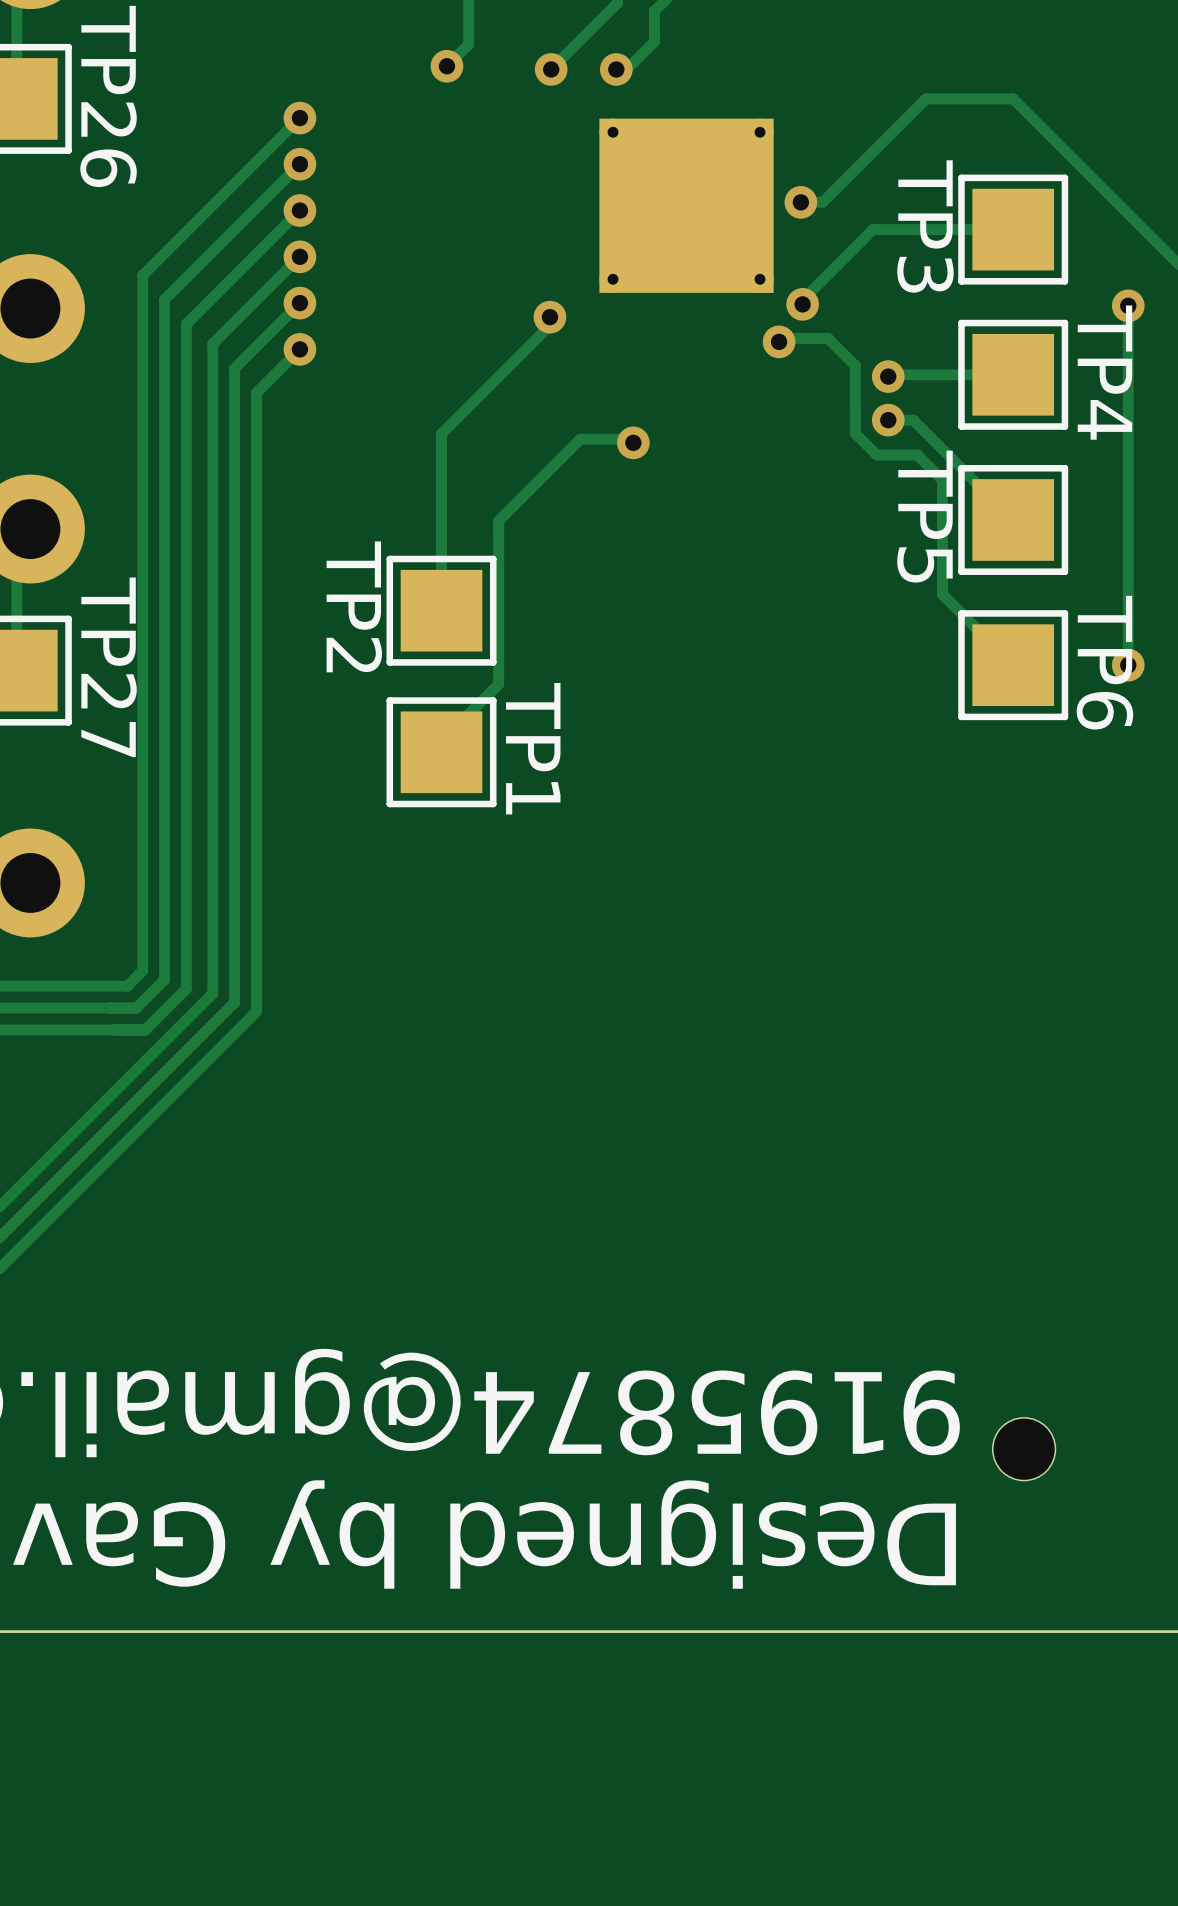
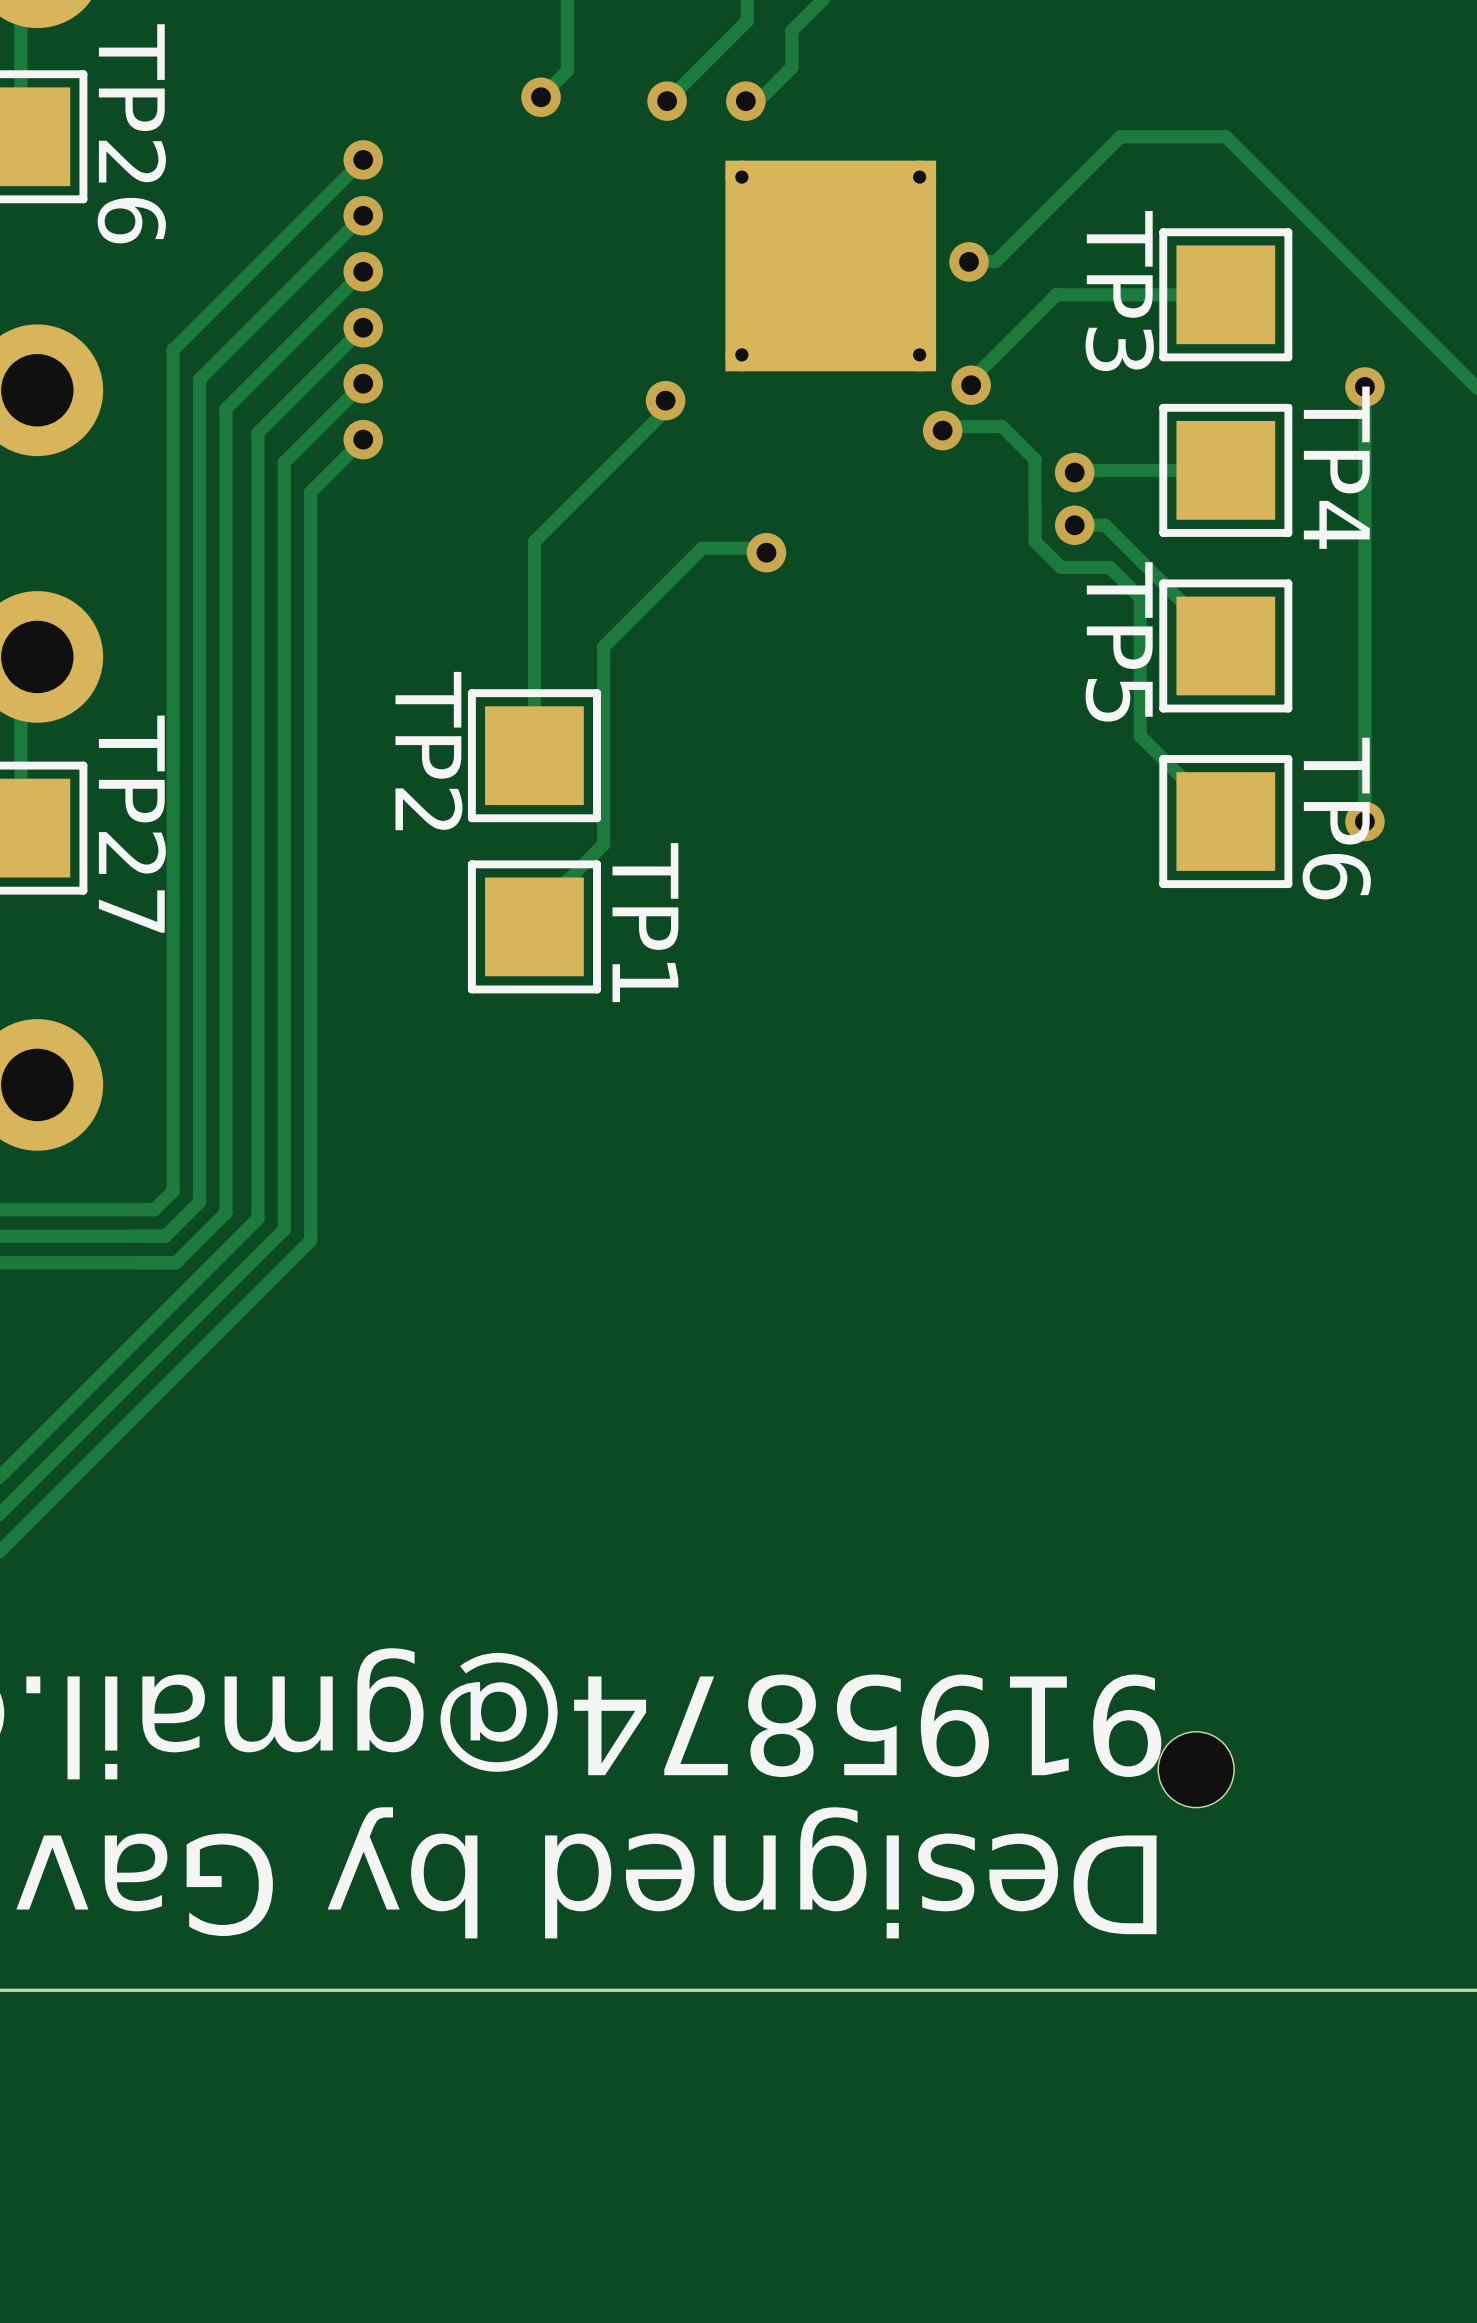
part position: (1024, 1449) -> (1196, 1769)

